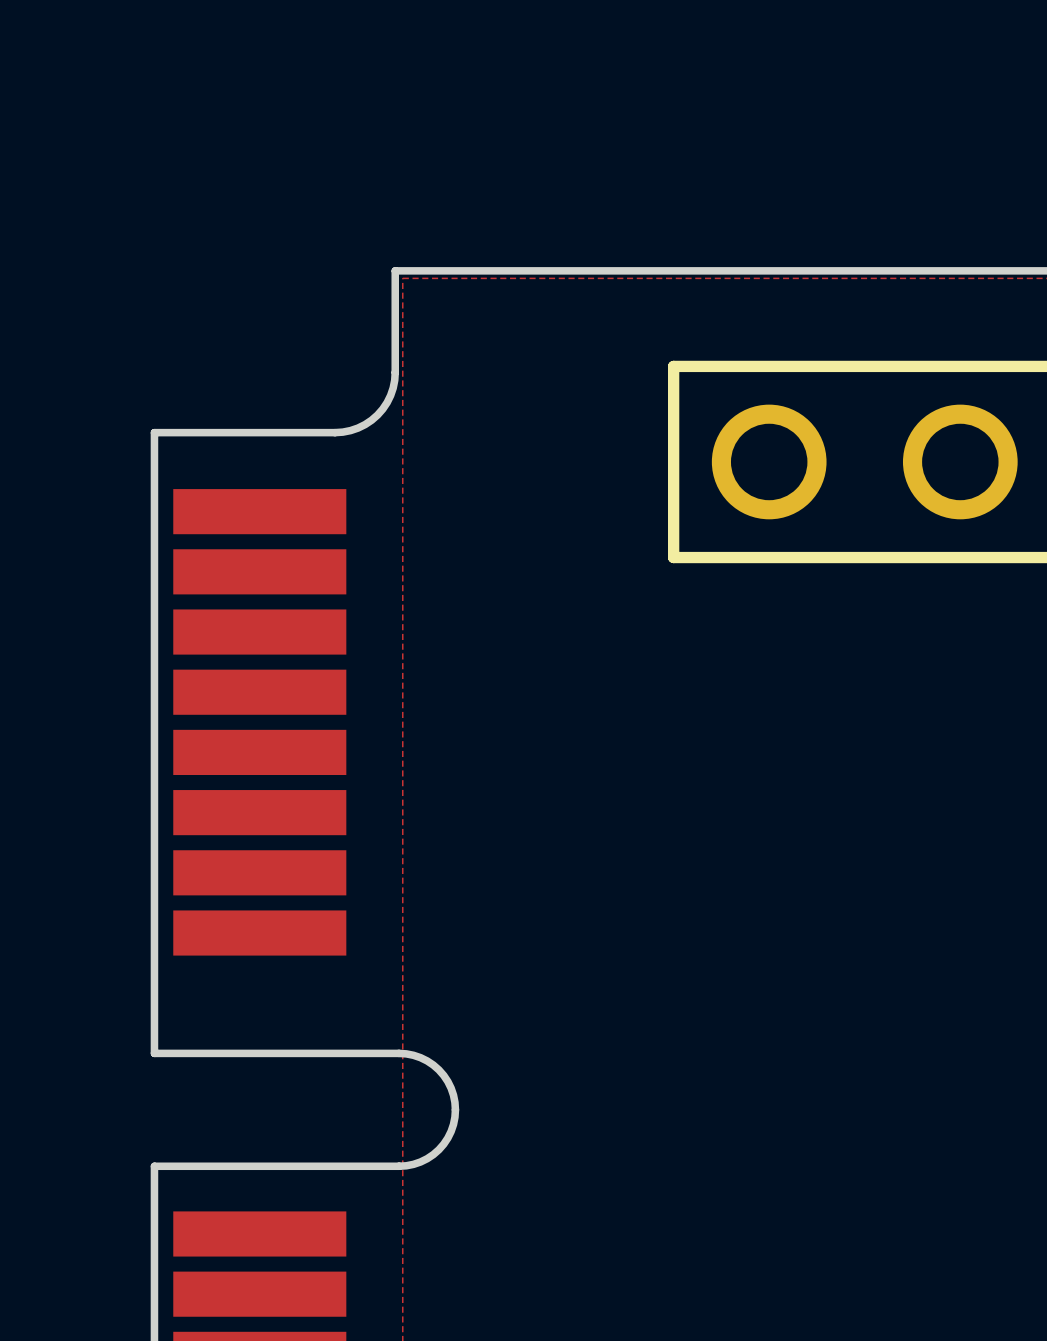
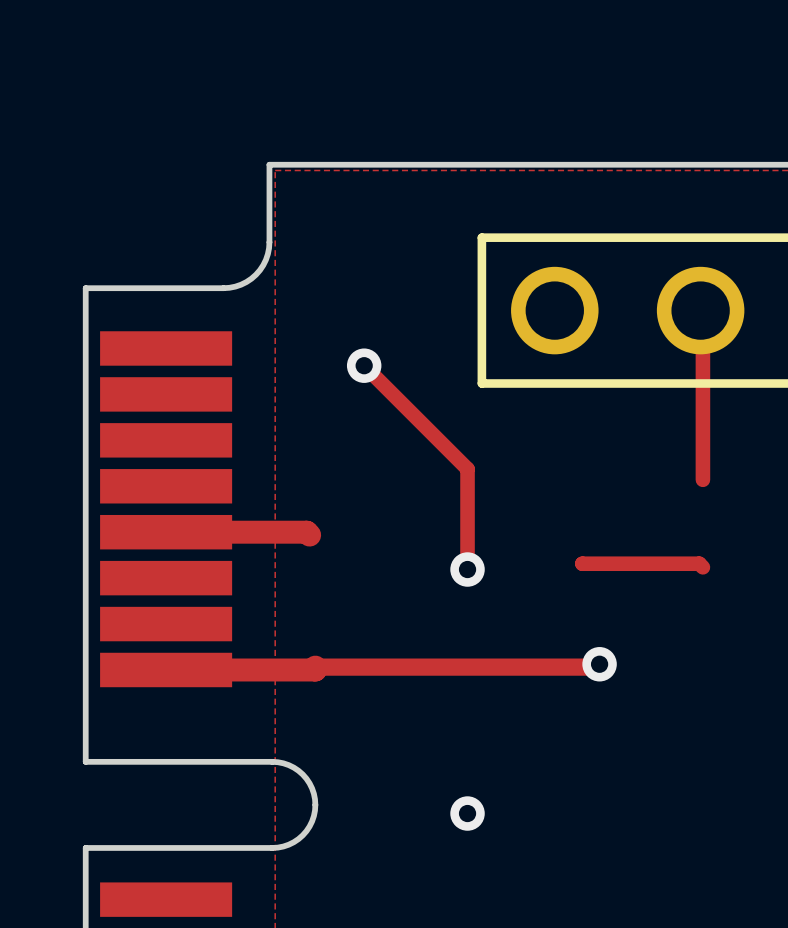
track: none -> (700, 310) (702, 312) (702, 479)
track: none -> (364, 365) (467, 469) (467, 569)
via: none -> (364, 365)
track: none -> (166, 532) (306, 532) (309, 535)
track: none -> (582, 563) (699, 563) (702, 567)
via: none -> (467, 569)
track: none -> (599, 664) (596, 667) (315, 667) (315, 669) (166, 669)
via: none -> (599, 664)
via: none -> (467, 813)

